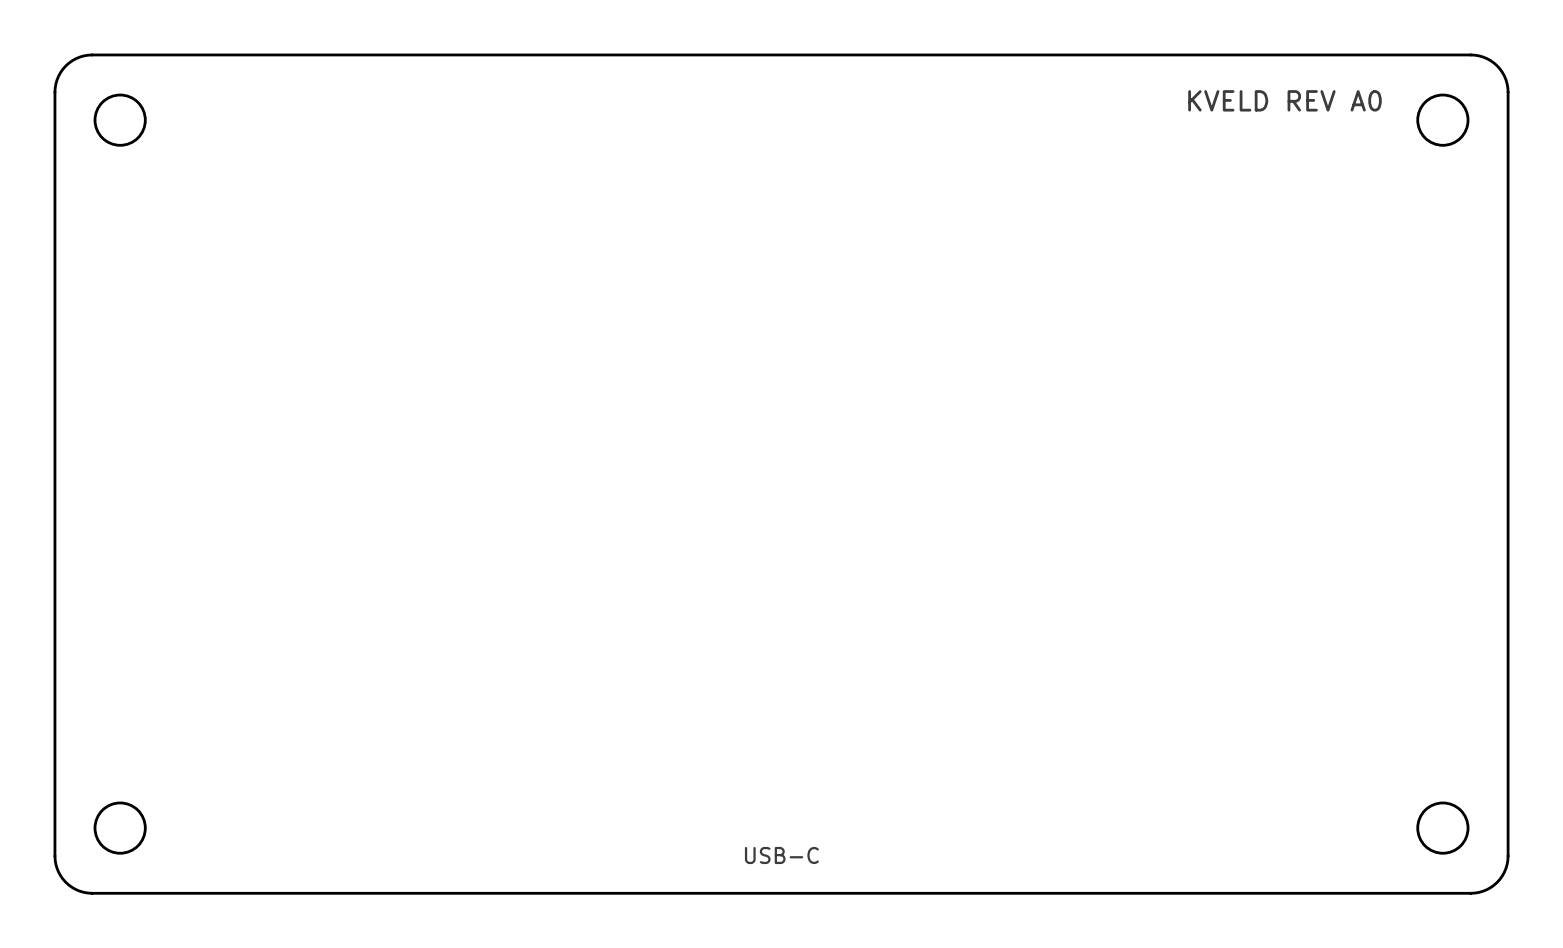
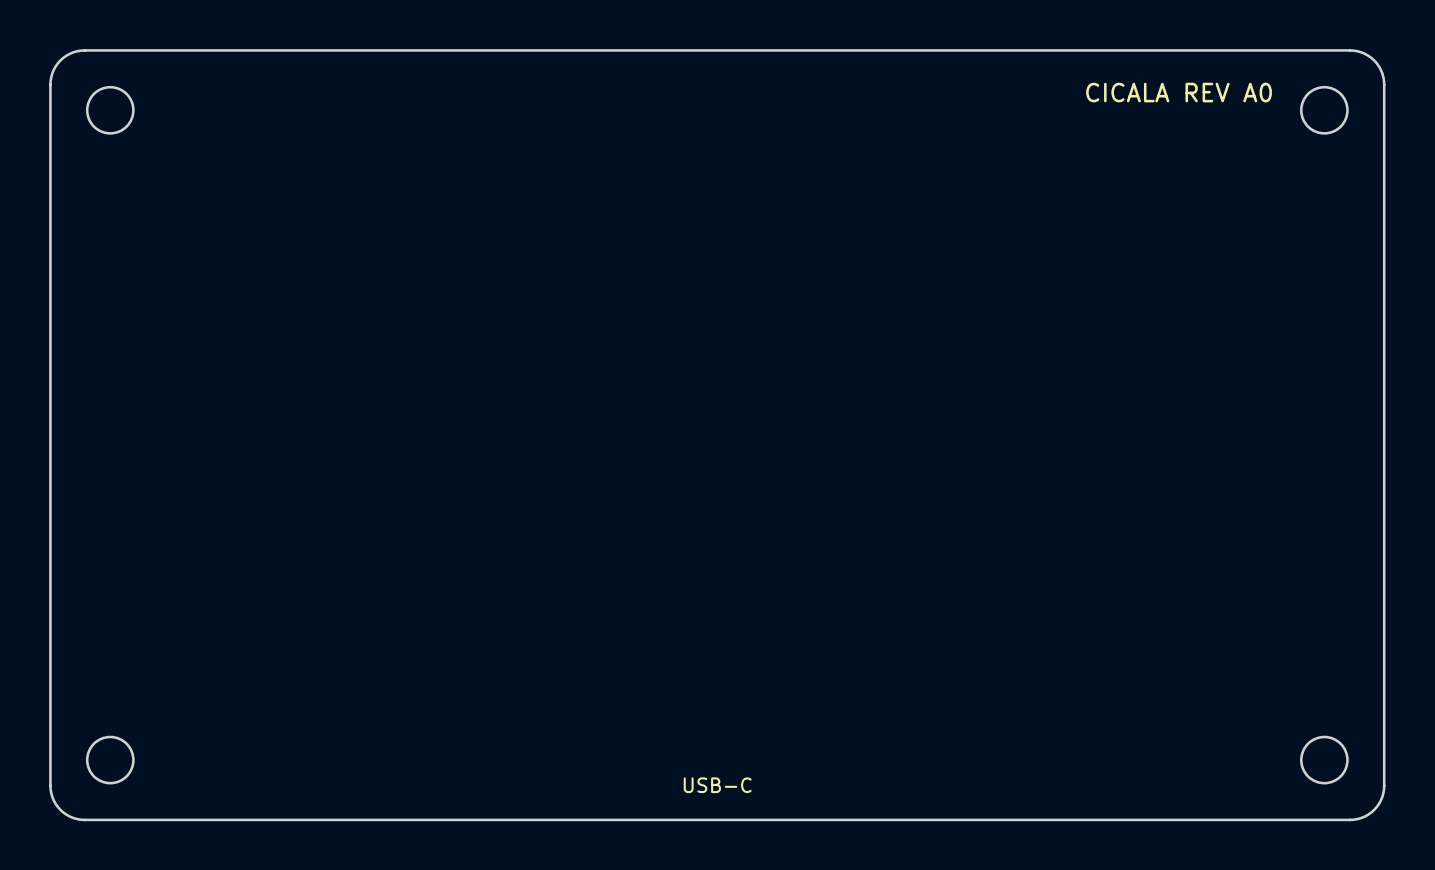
text: KVELD REV A0 (1284, 100) -> CICALA REV A0 (1179, 92)

